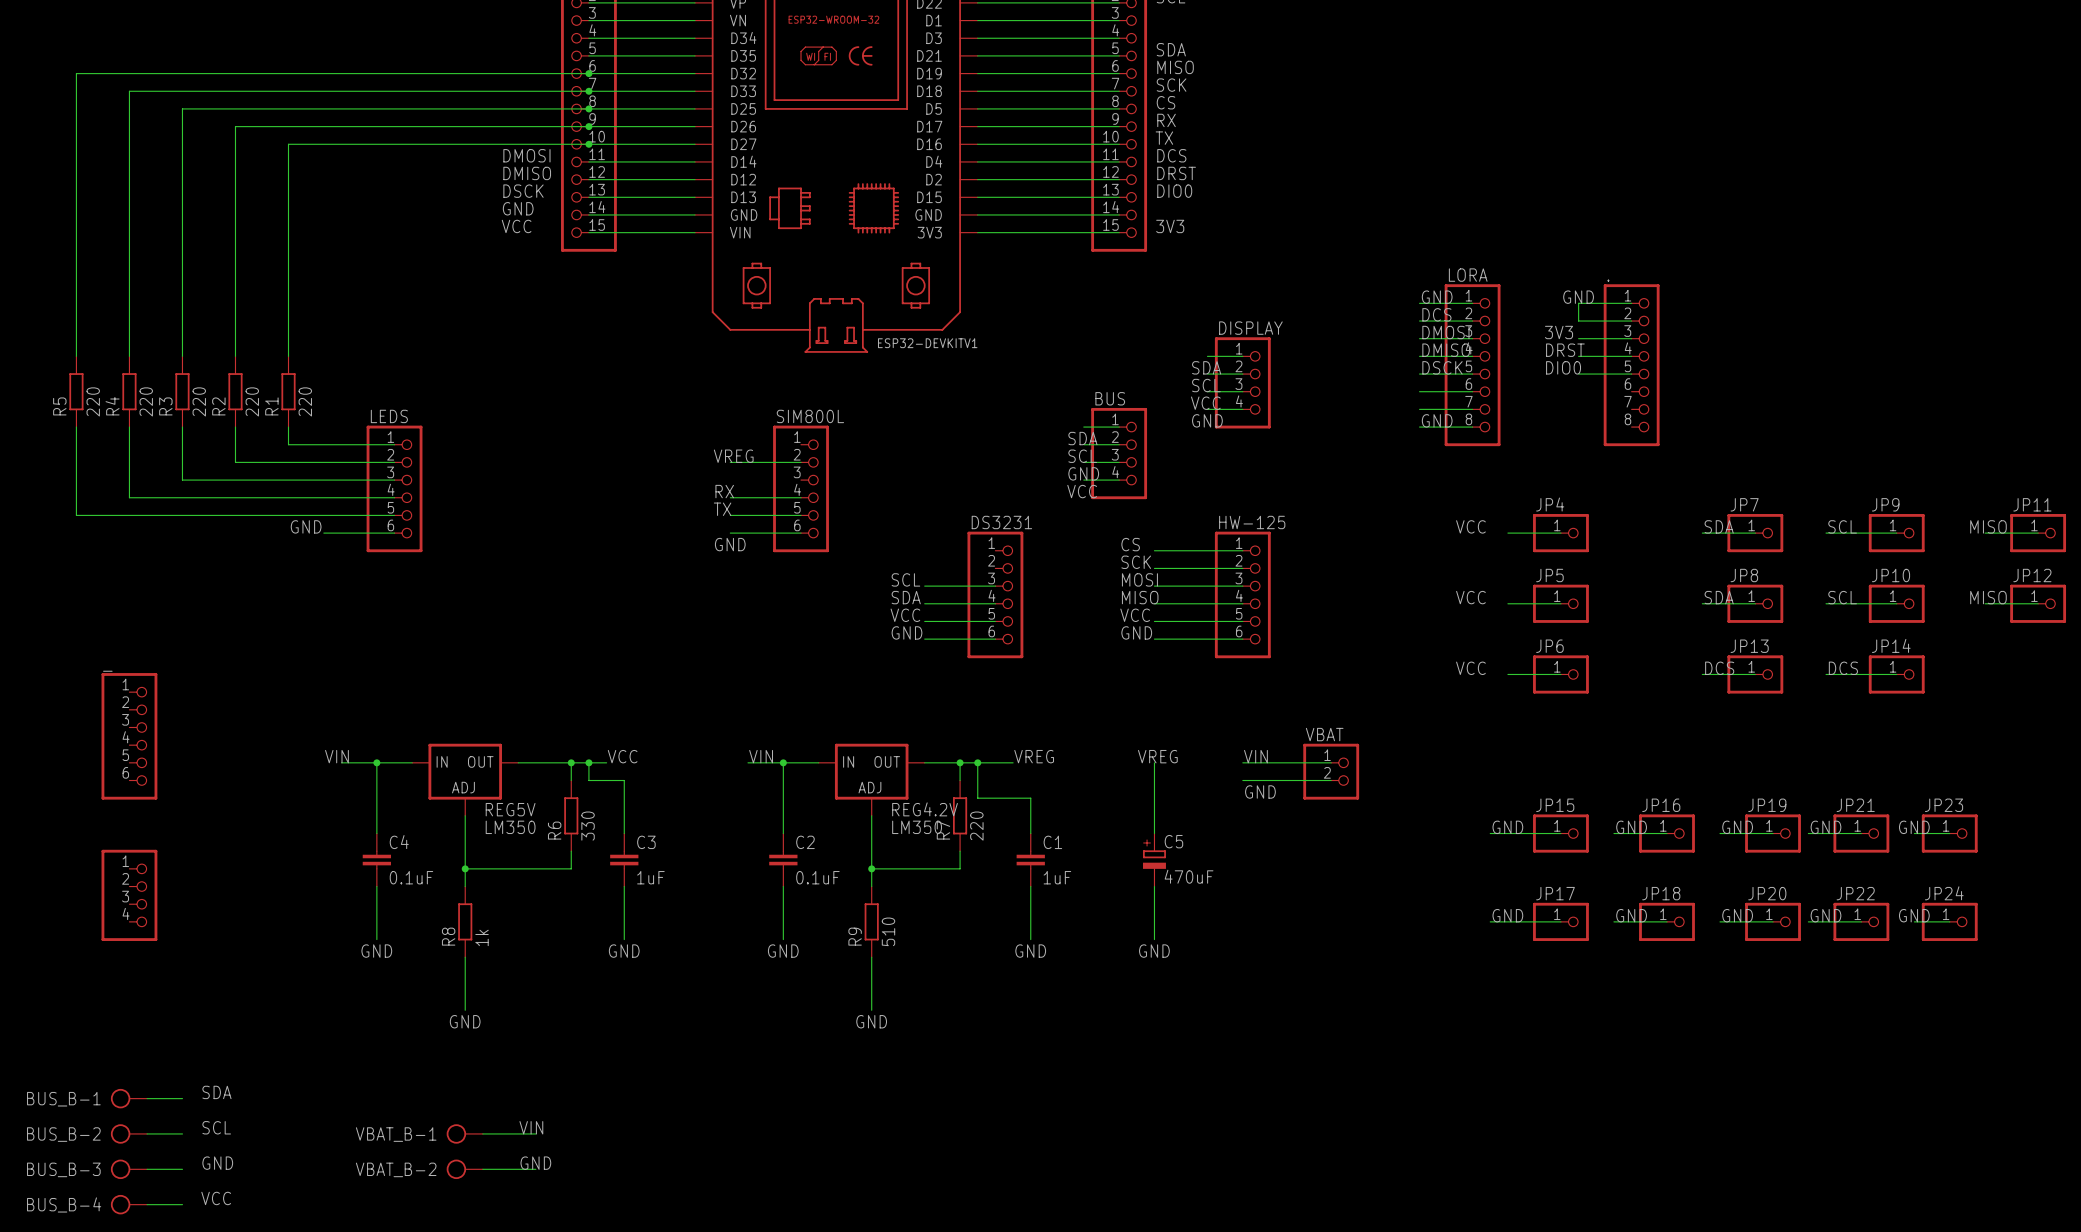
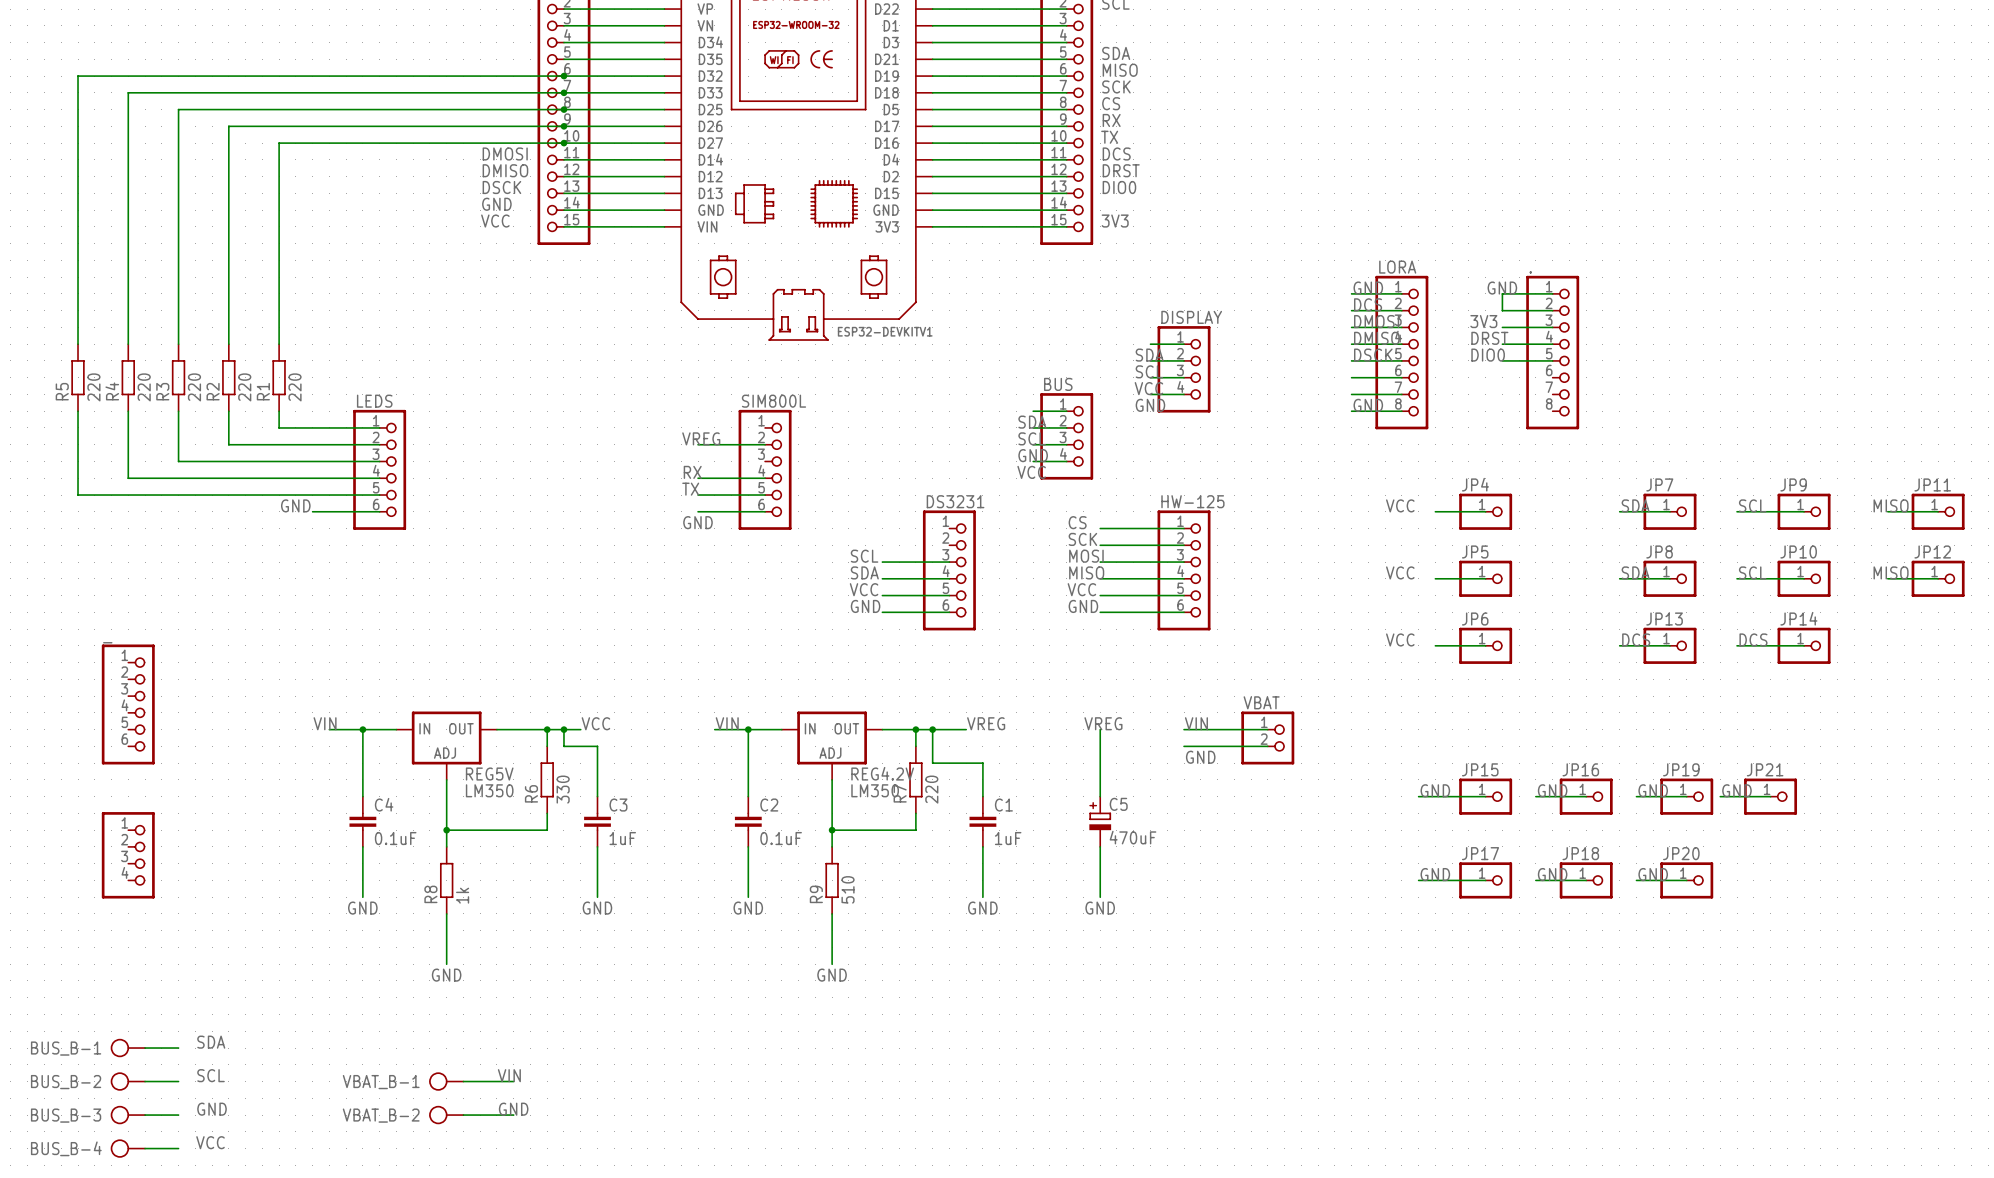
label: GND (1914, 827) -> none
wire: (1914, 833) (1949, 833) -> none
JP23: (1949, 833) -> none
label: GND (1825, 915) -> none
label: GND (1914, 915) -> none
wire: (1808, 921) (1861, 921) -> none
JP22: (1861, 921) -> none
wire: (1914, 921) (1949, 921) -> none
JP24: (1949, 921) -> none

